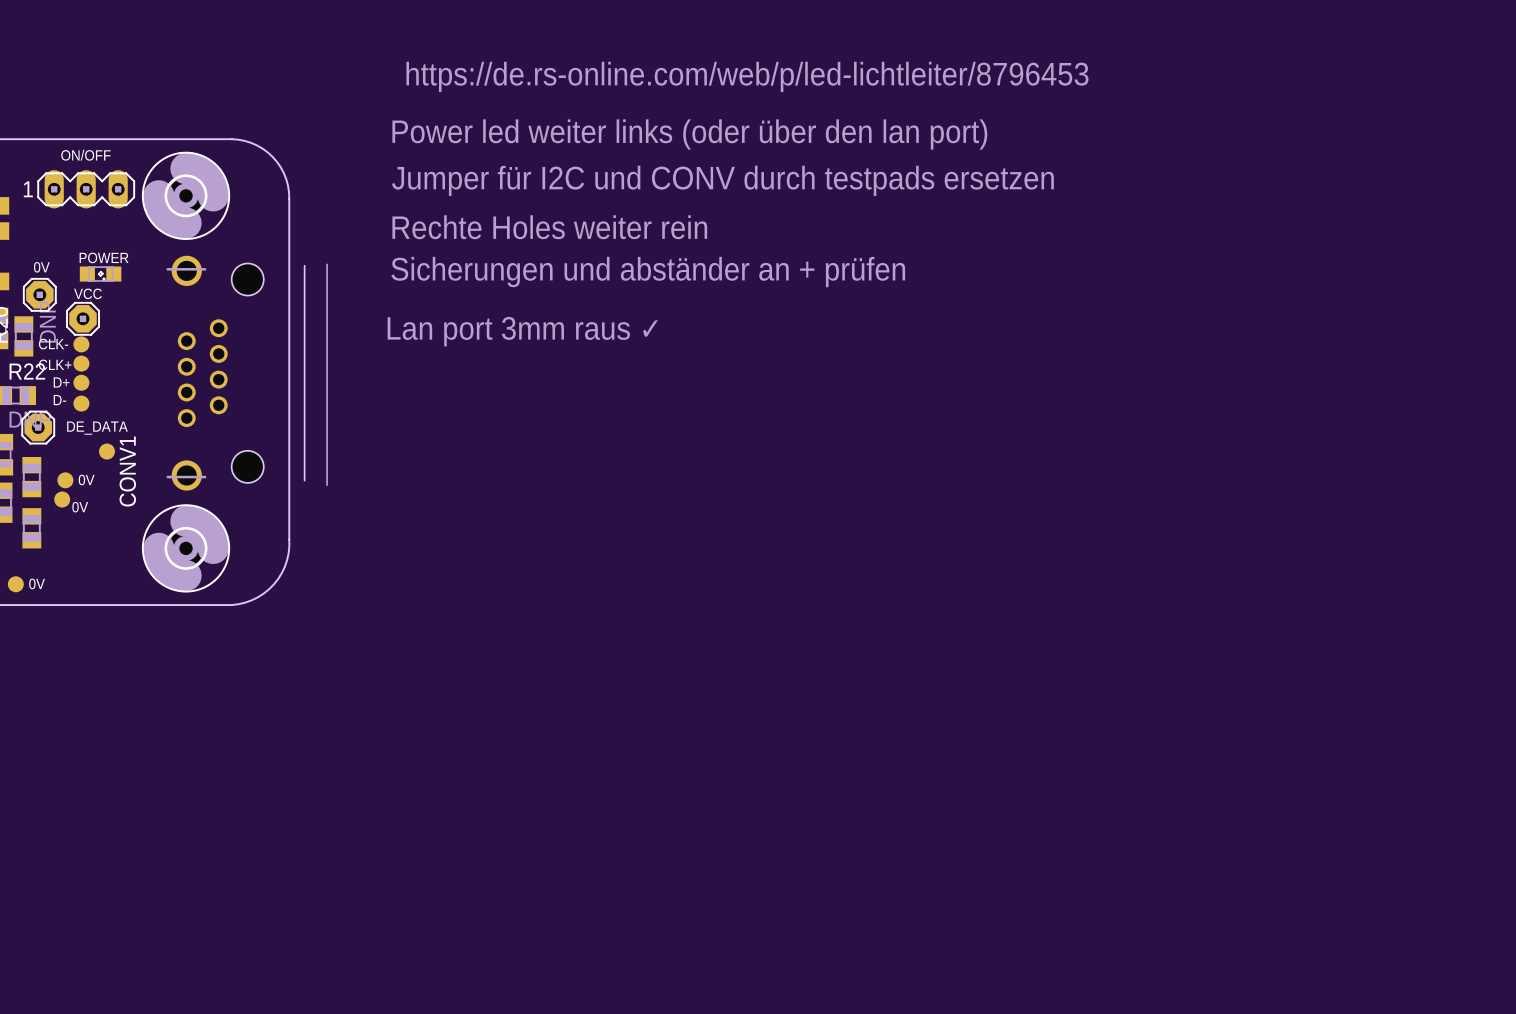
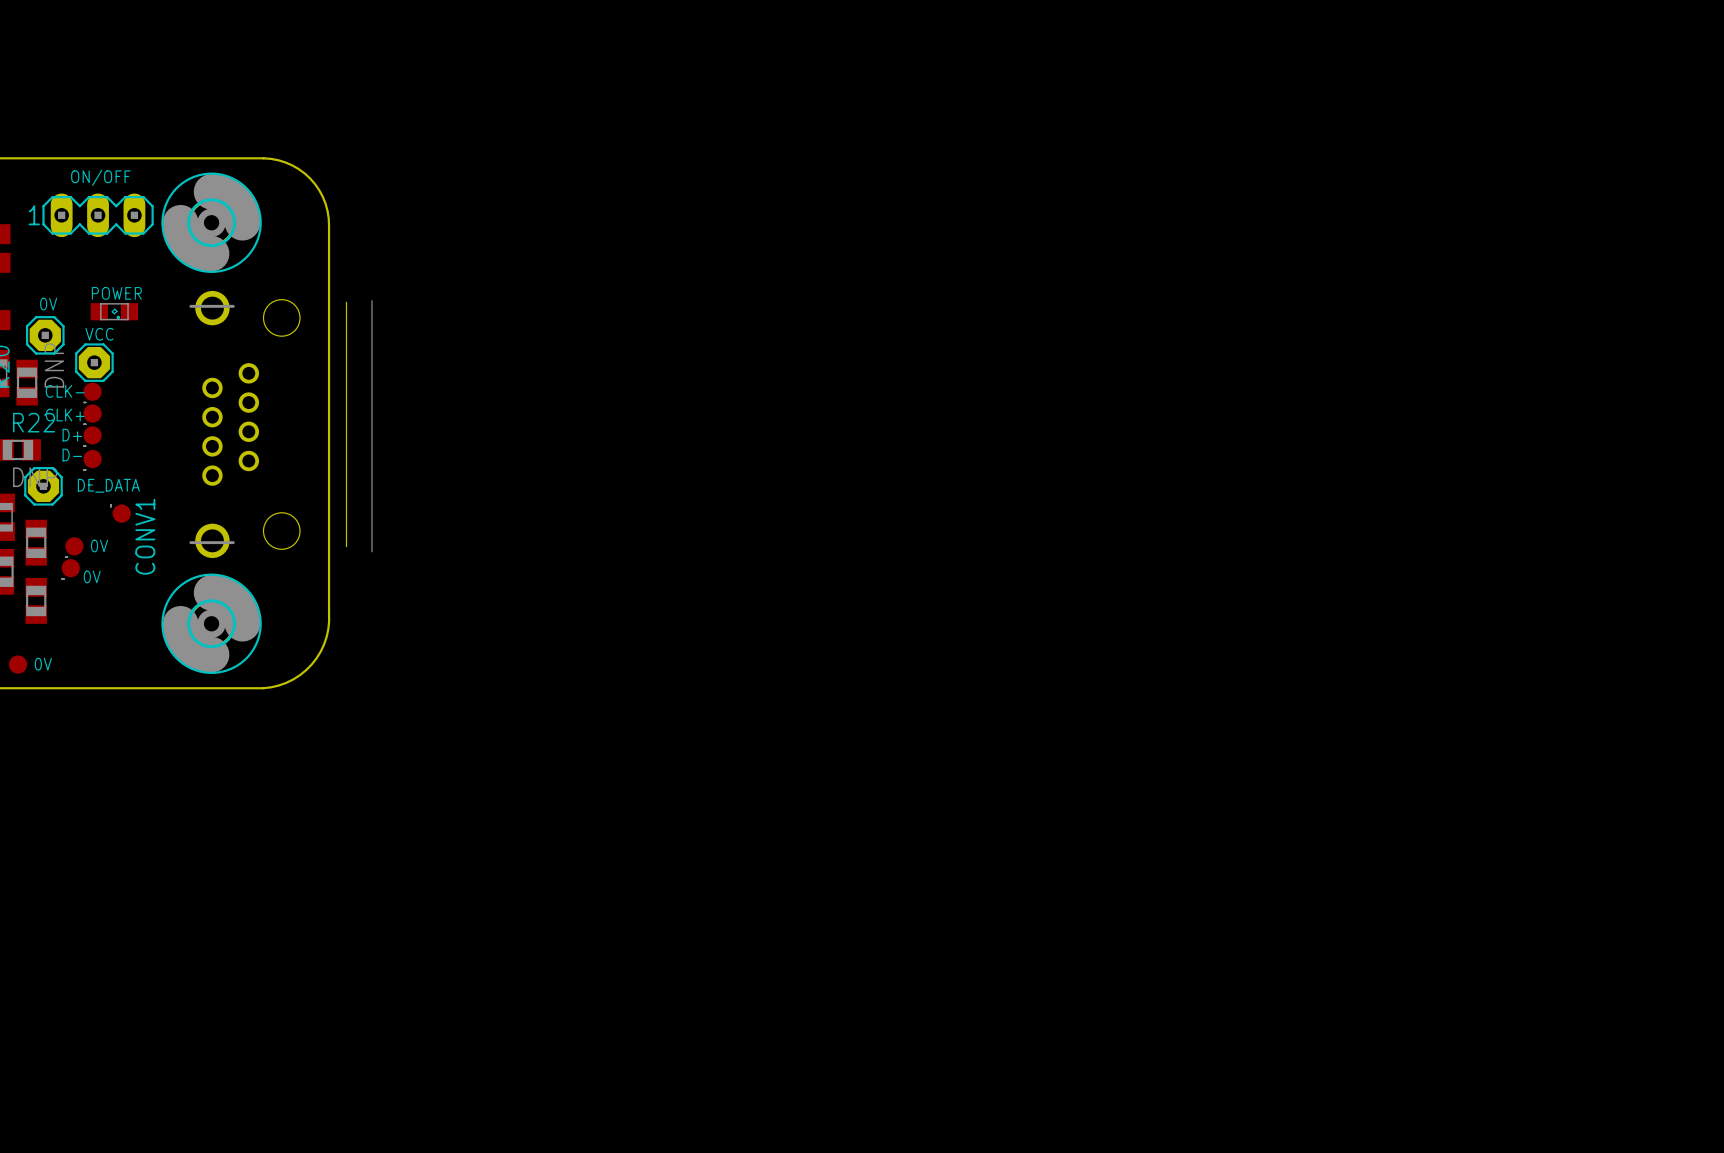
text: https://de.rs-online.com/web/p/led-lichtleiter/8796453 (747, 76) -> none
text: Power led weiter links (oder über den lan port) (689, 134) -> none
text: Jumper für I2C und CONV durch testpads ersetzen (722, 180) -> none
text: Rechte Holes weiter rein (549, 227) -> none
text: Sicherungen und abständer an + prüfen (648, 272) -> none
text: Lan port 3mm raus ✓ (522, 331) -> none

